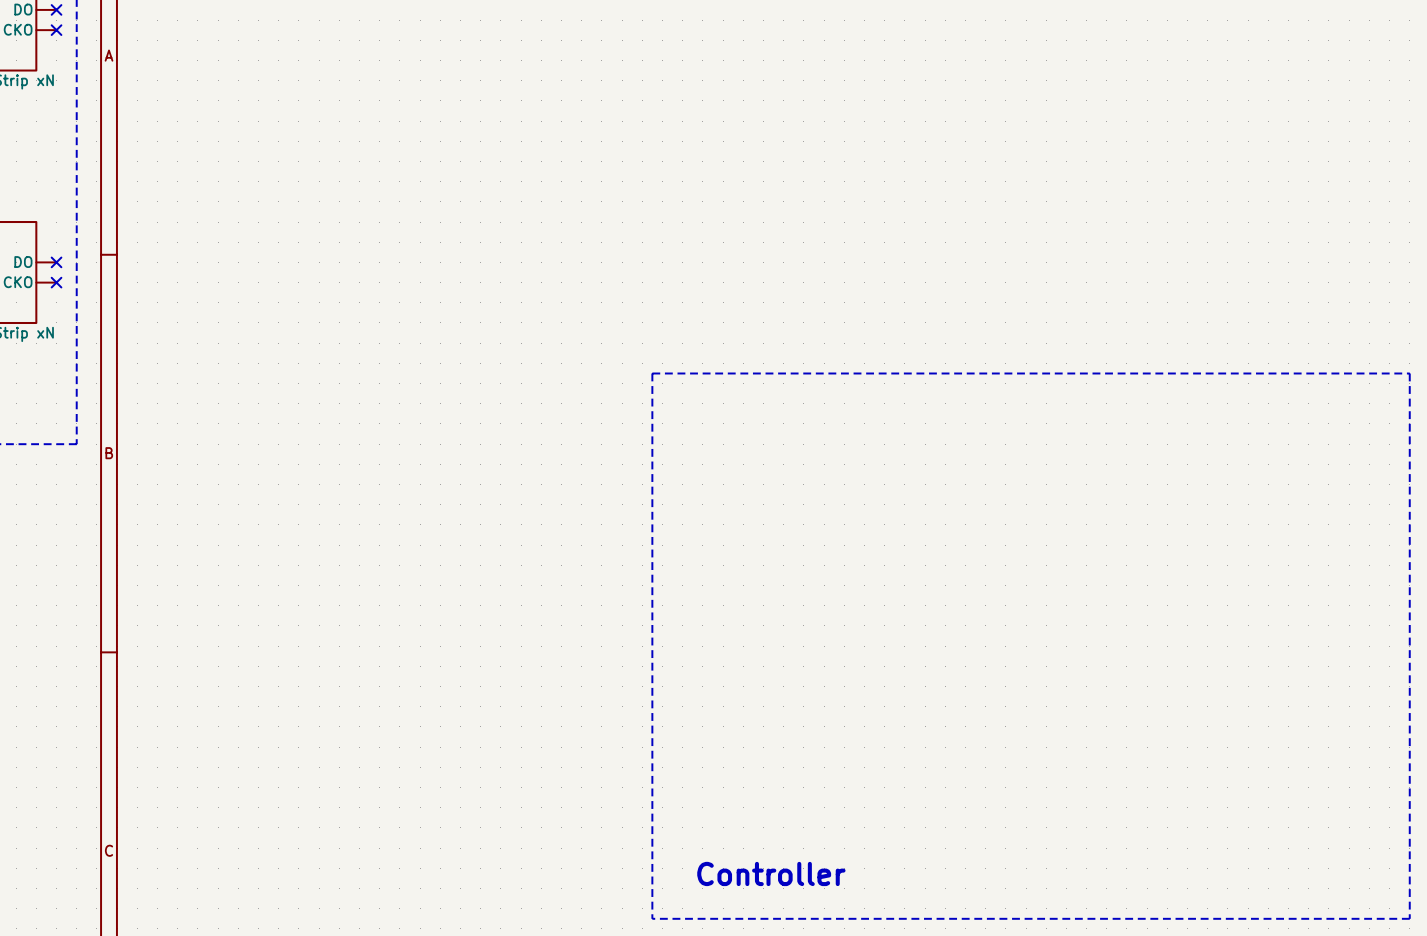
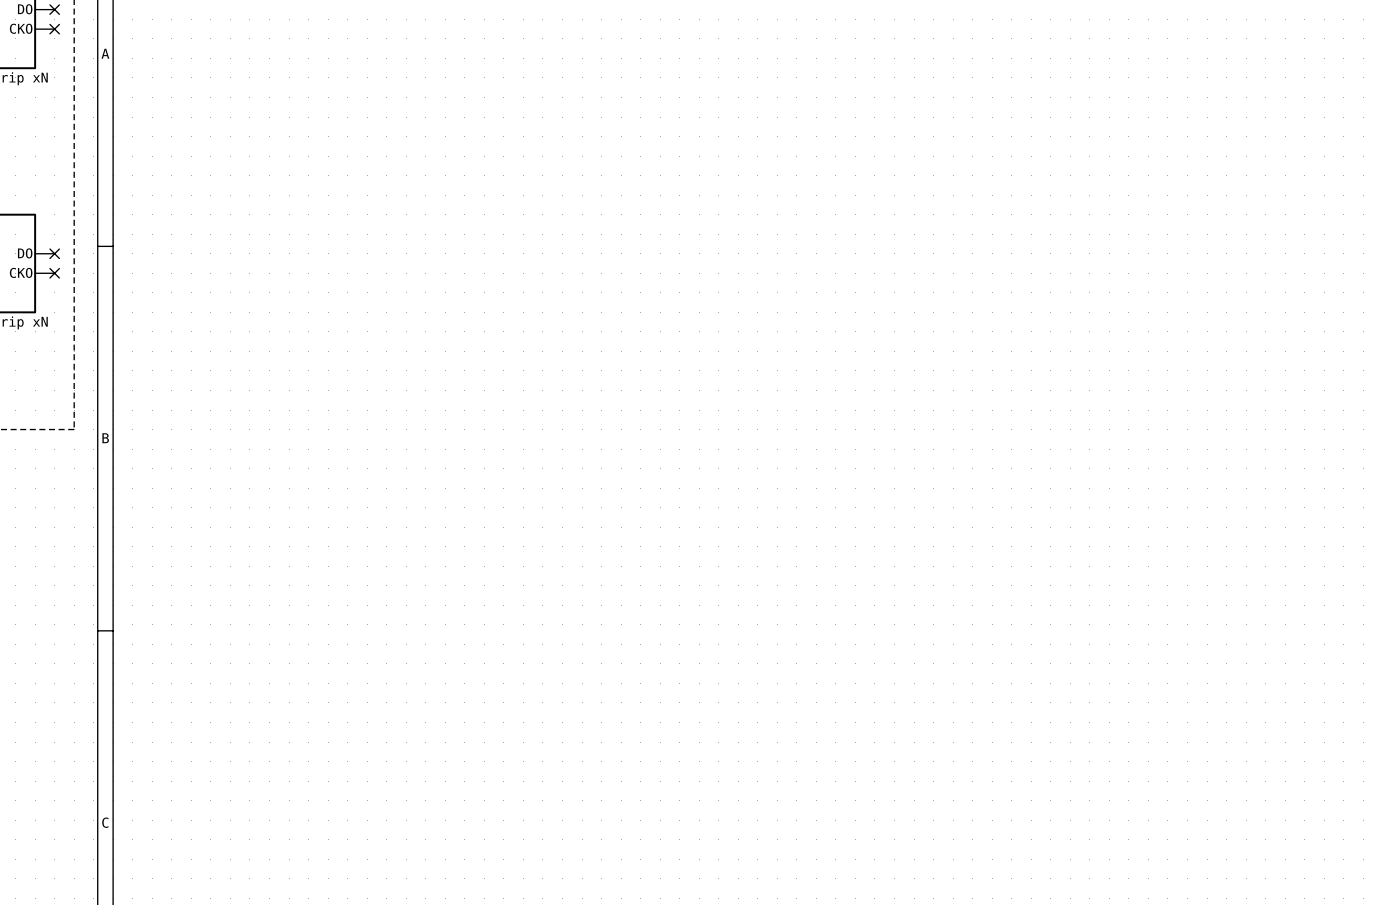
line: (652, 373) (652, 918) (1409, 918) (1409, 373) (652, 373) -> none
text: Controller (771, 873) -> none

